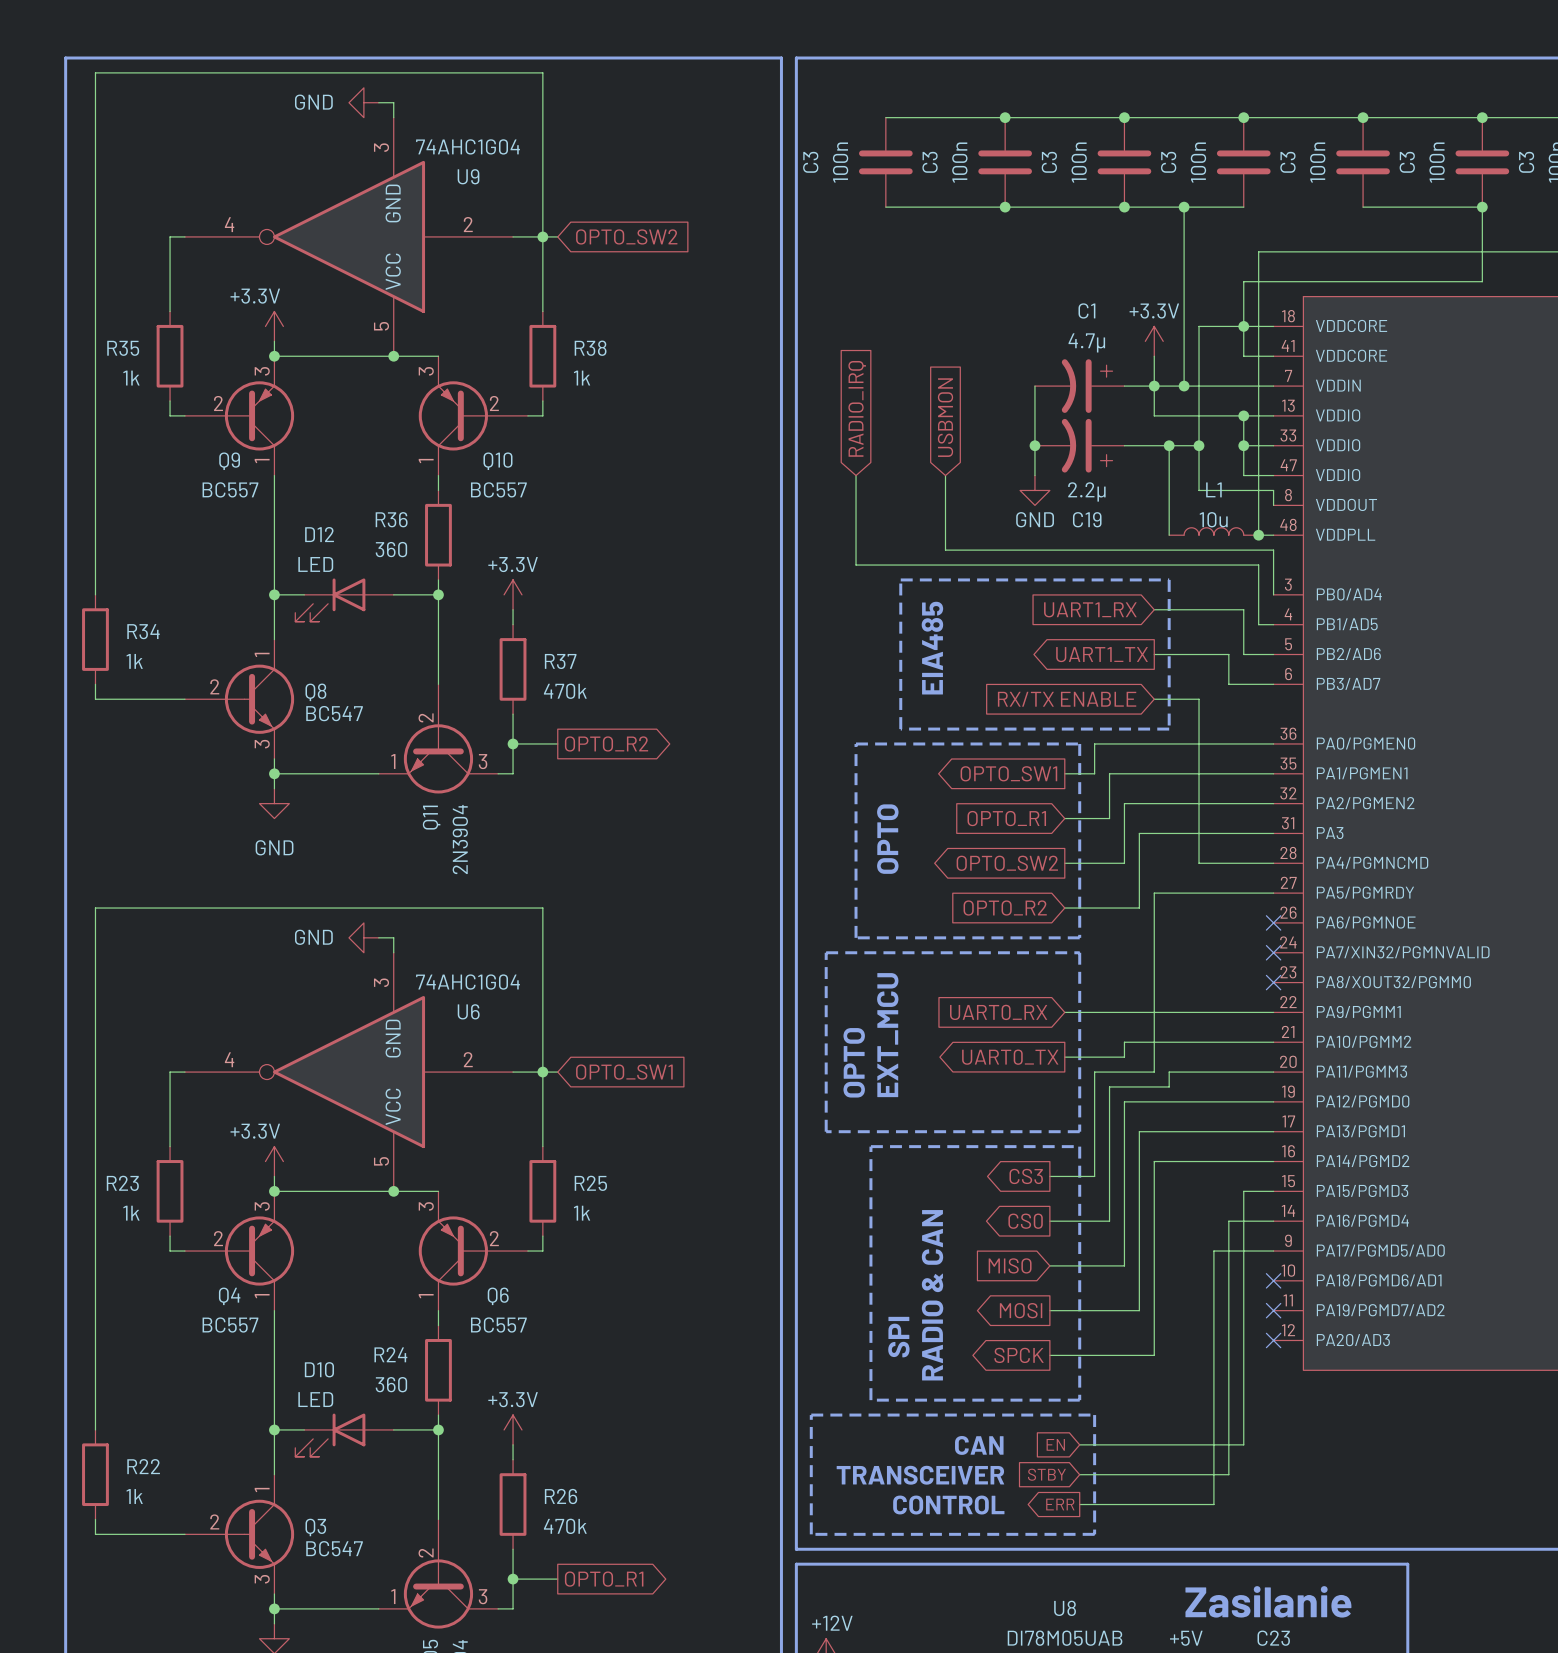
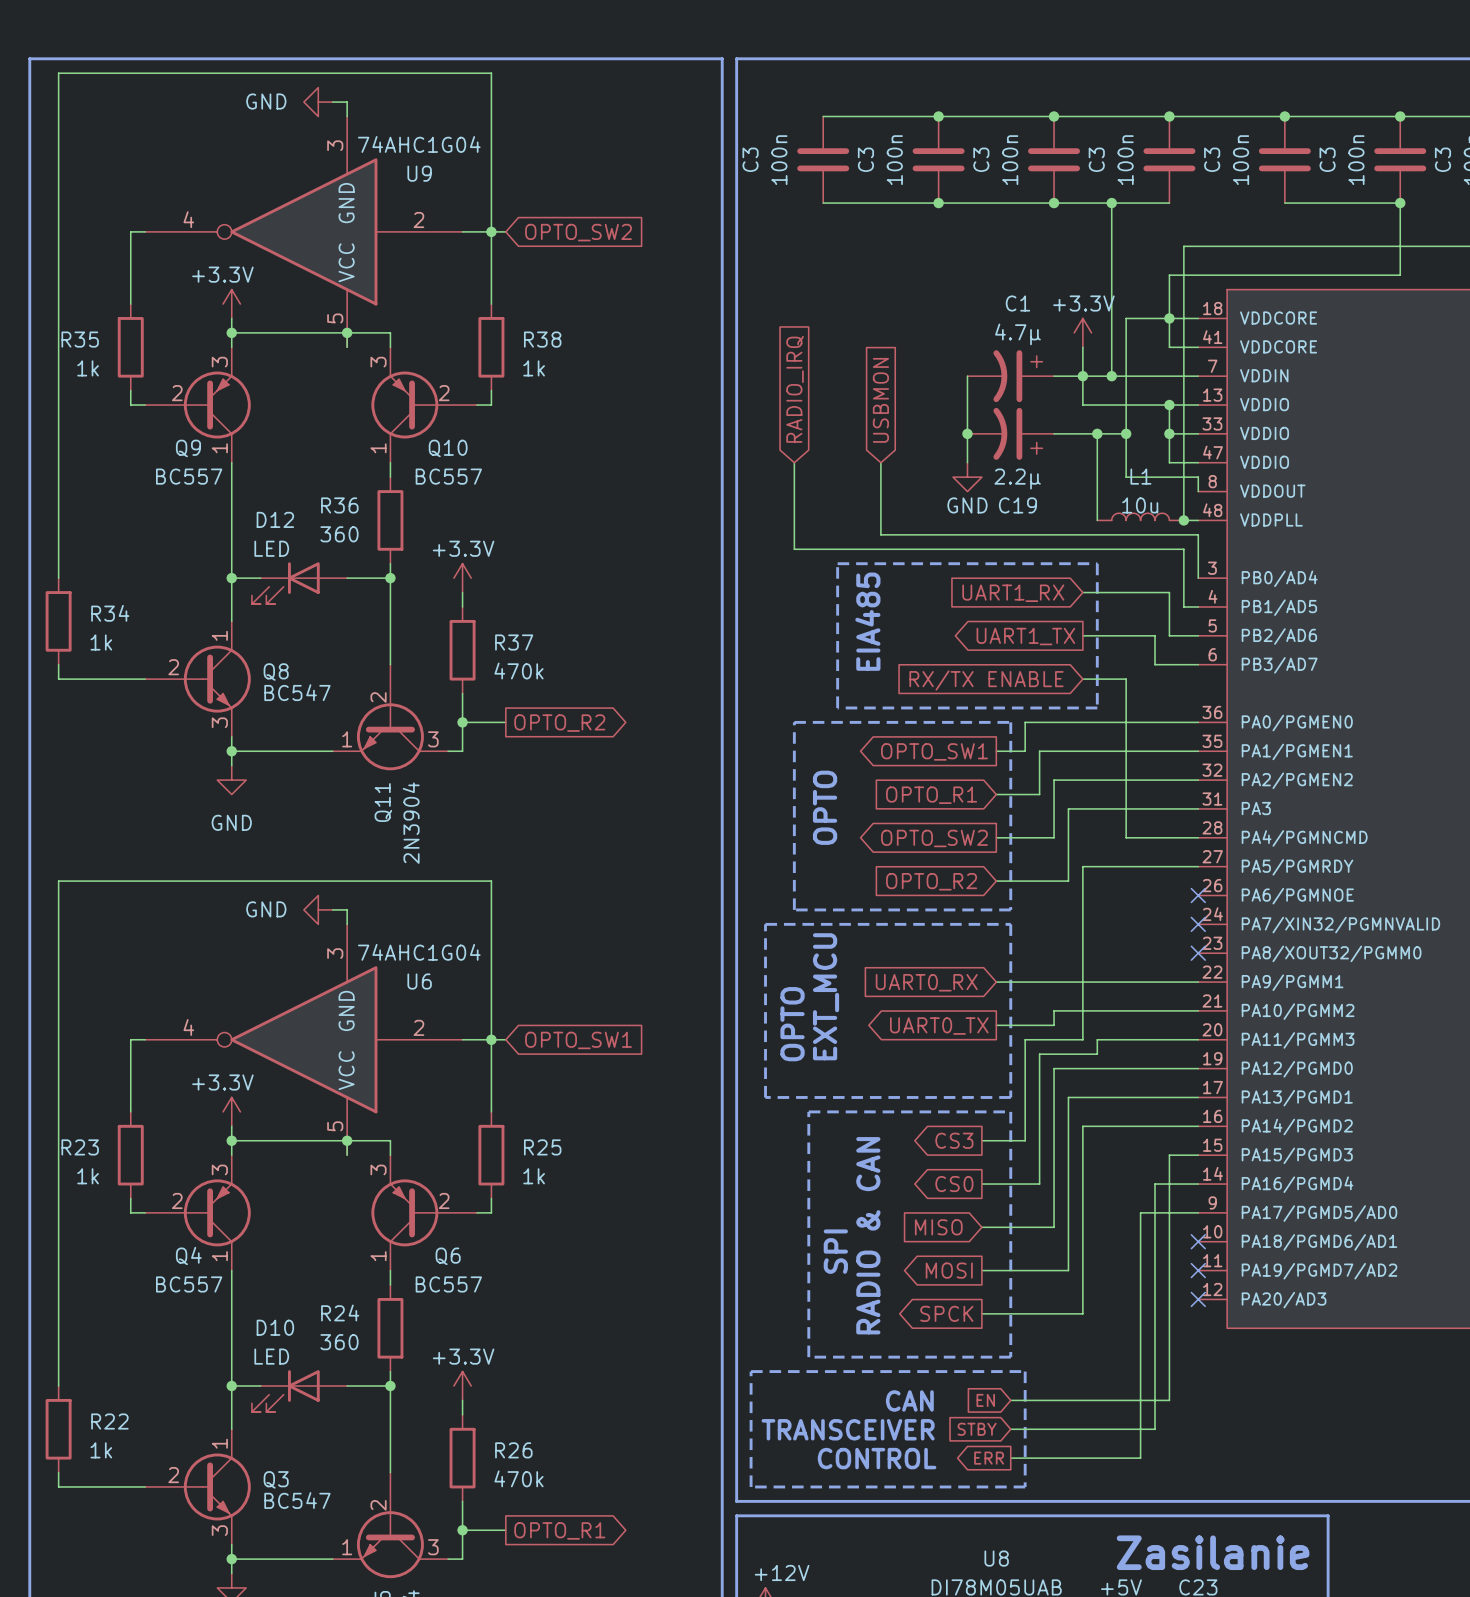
power symbol position: +3.3V (274, 326) -> +3.3V (231, 304)
wire: (274, 356) (438, 356) -> (231, 318) (231, 332) (390, 332) (390, 347)
junction position: (274, 356) -> (231, 332)
junction position: (393, 356) -> (347, 332)
power symbol position: +3.3V (274, 1161) -> +3.3V (231, 1111)
wire: (274, 1191) (438, 1191) -> (231, 1126) (231, 1140) (390, 1140) (390, 1155)
junction position: (274, 1191) -> (231, 1140)
junction position: (393, 1191) -> (347, 1140)

